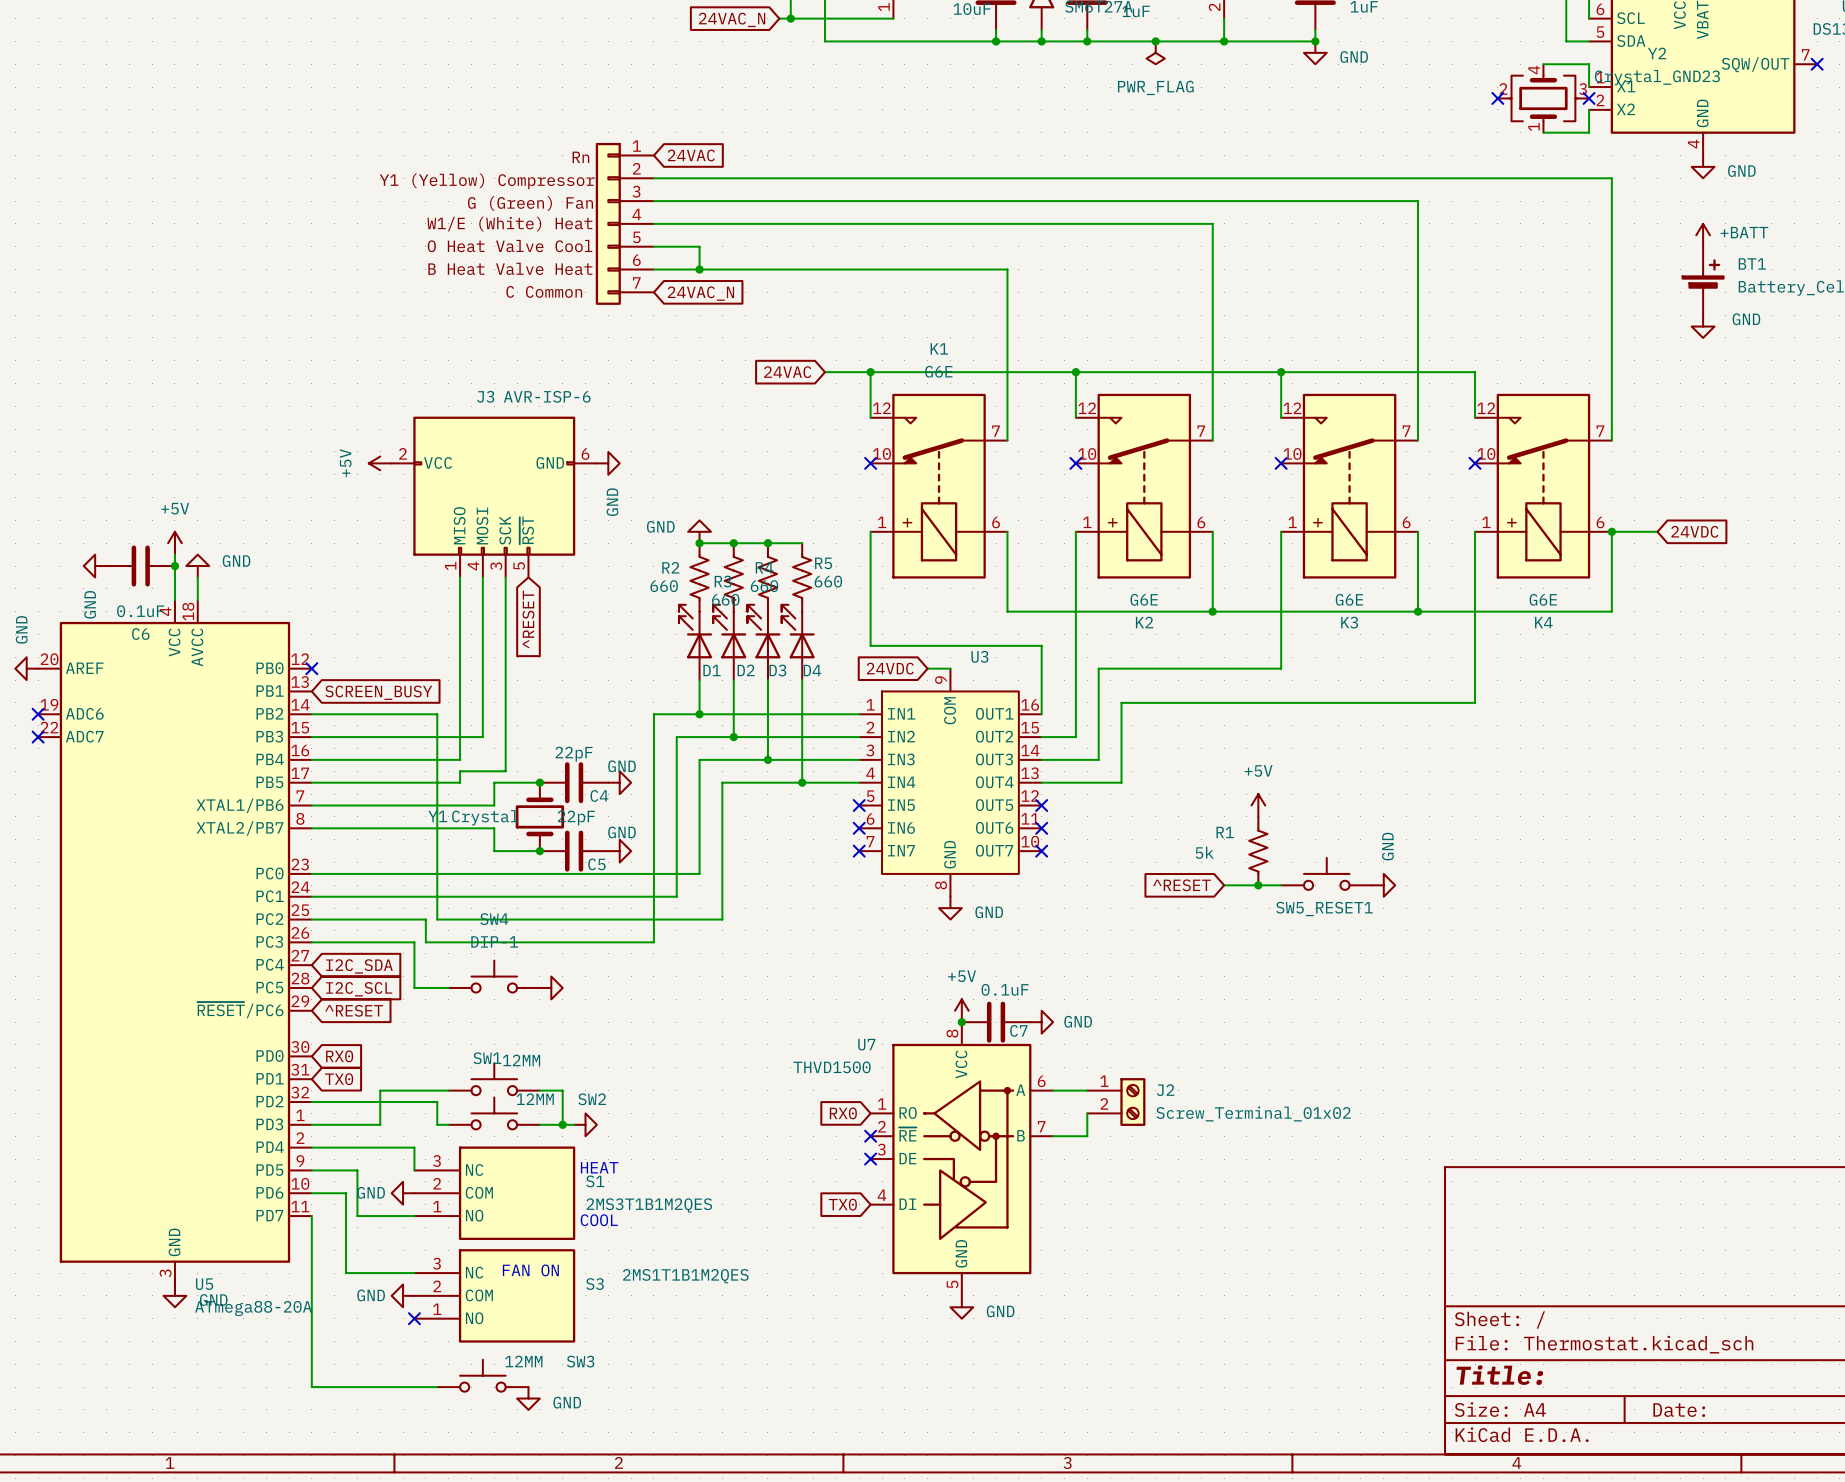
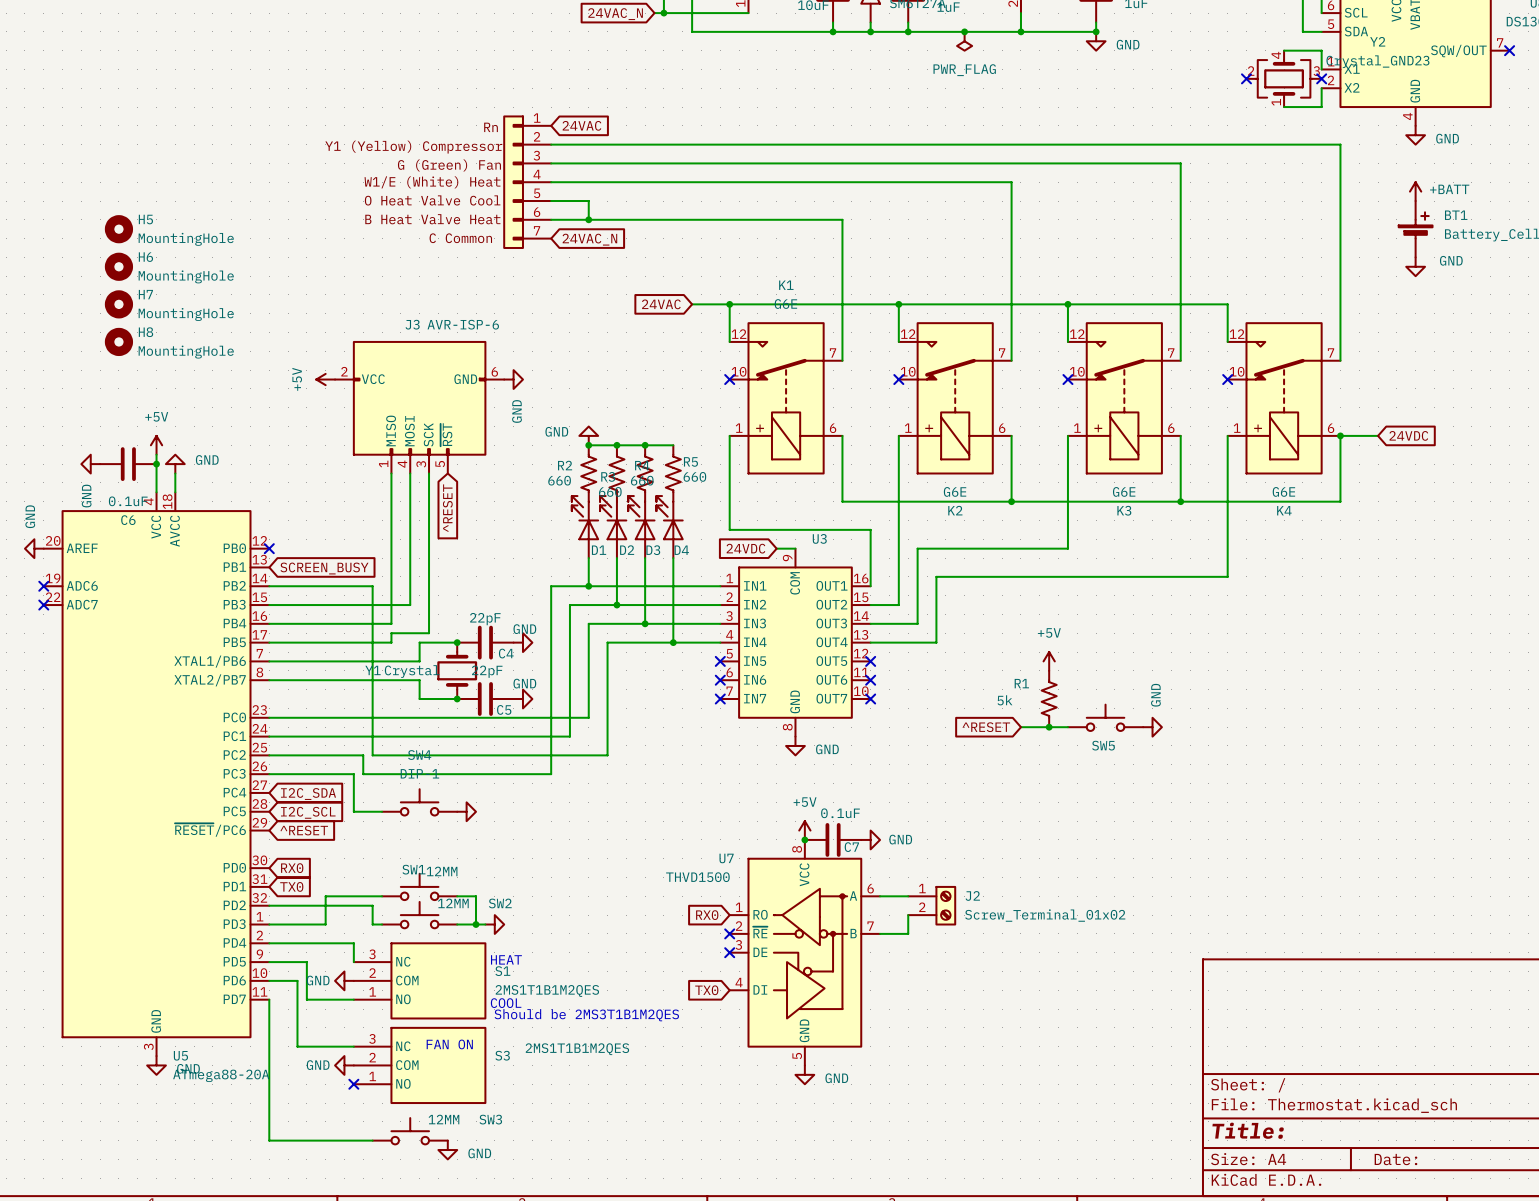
H5: none -> MountingHole (118, 229)
H6: none -> MountingHole (118, 266)
H7: none -> MountingHole (118, 304)
H8: none -> MountingHole (118, 341)
SW5_RESET1 name: SW5_RESET1 (1324, 909) -> SW5 (1103, 745)
S1 value: 2MS3T1B1M2QES (649, 1205) -> 2MS1T1B1M2QES (547, 990)
text: none -> Should be 2MS3T1B1M2QES (586, 1015)

